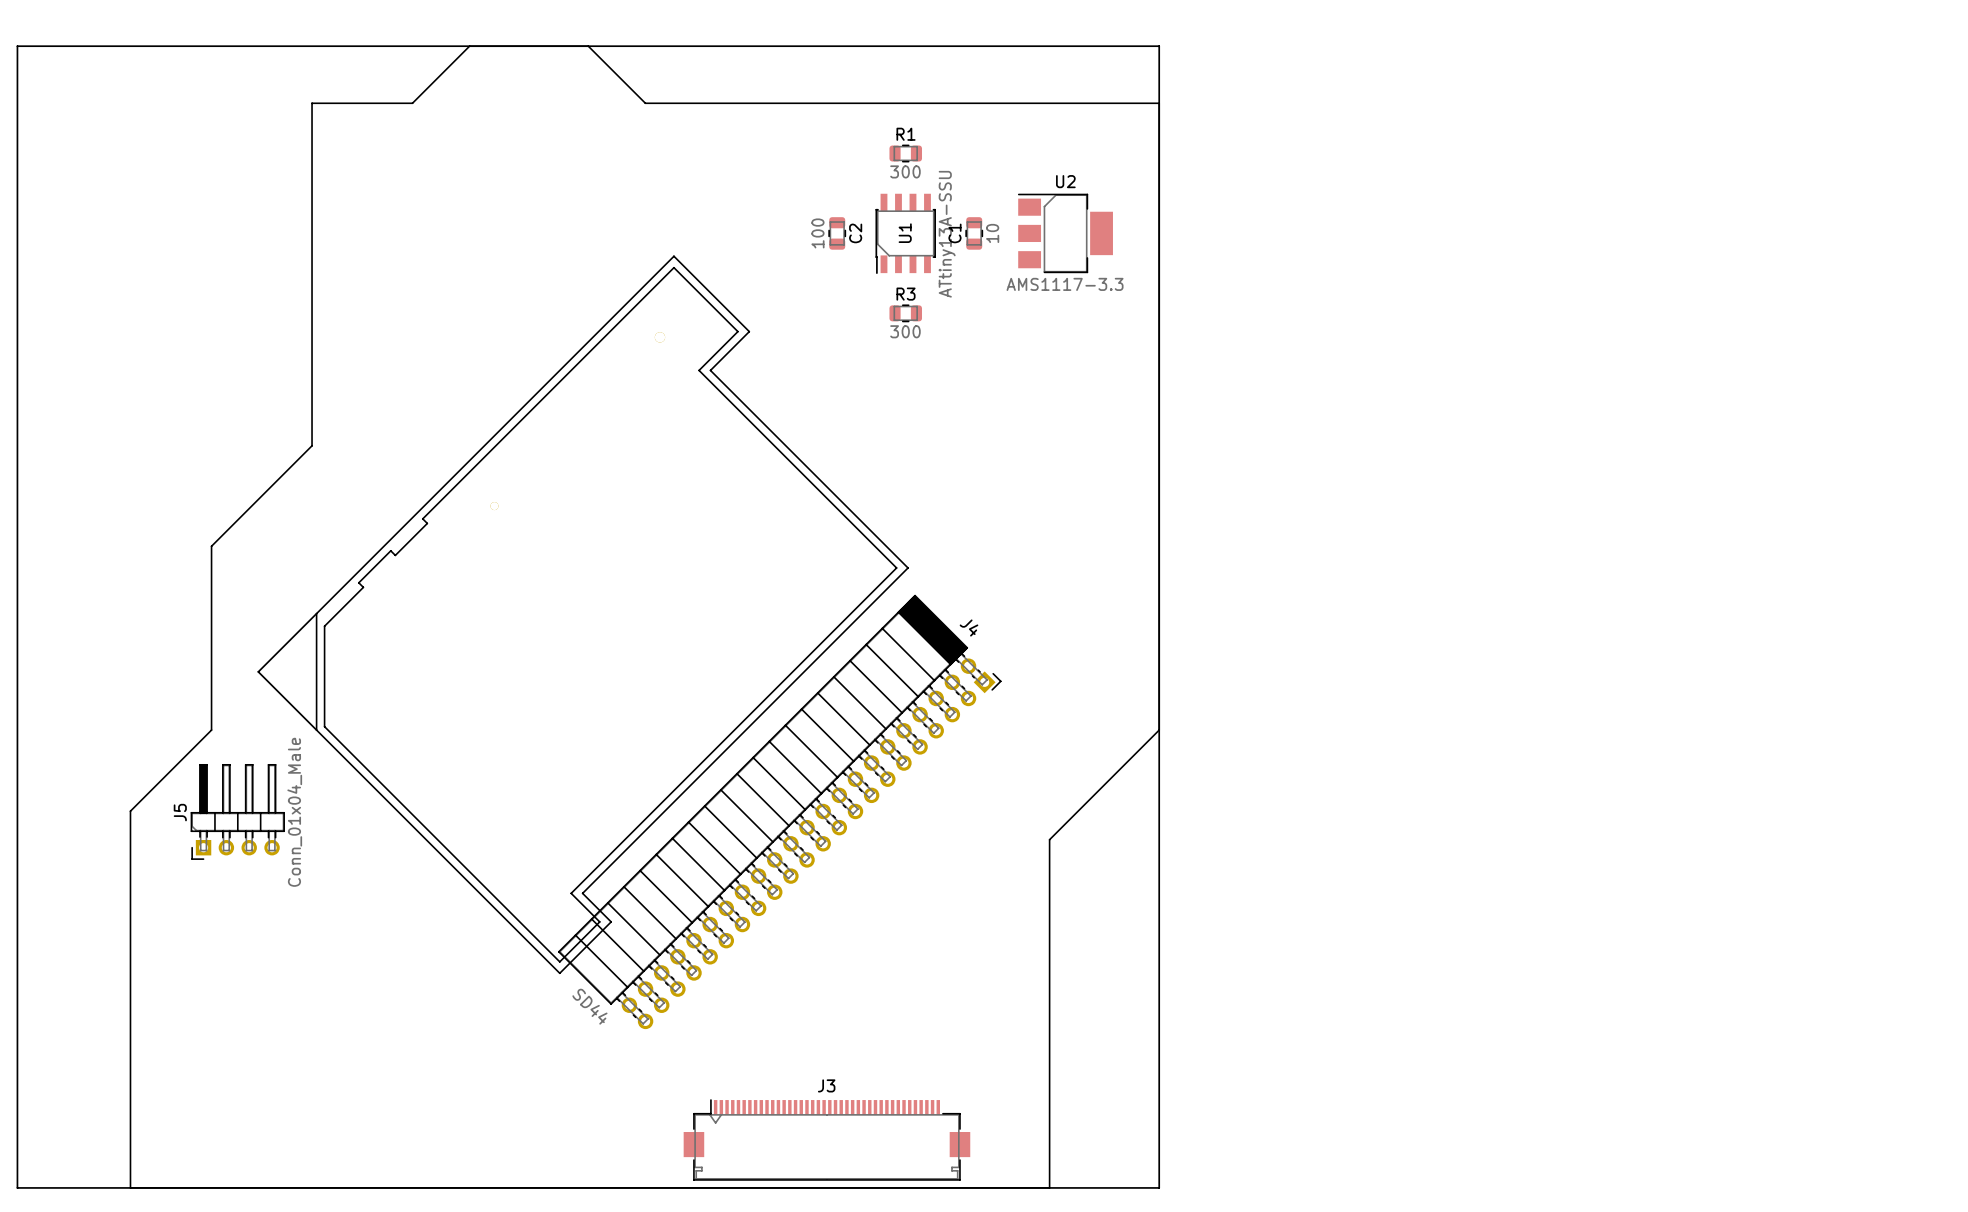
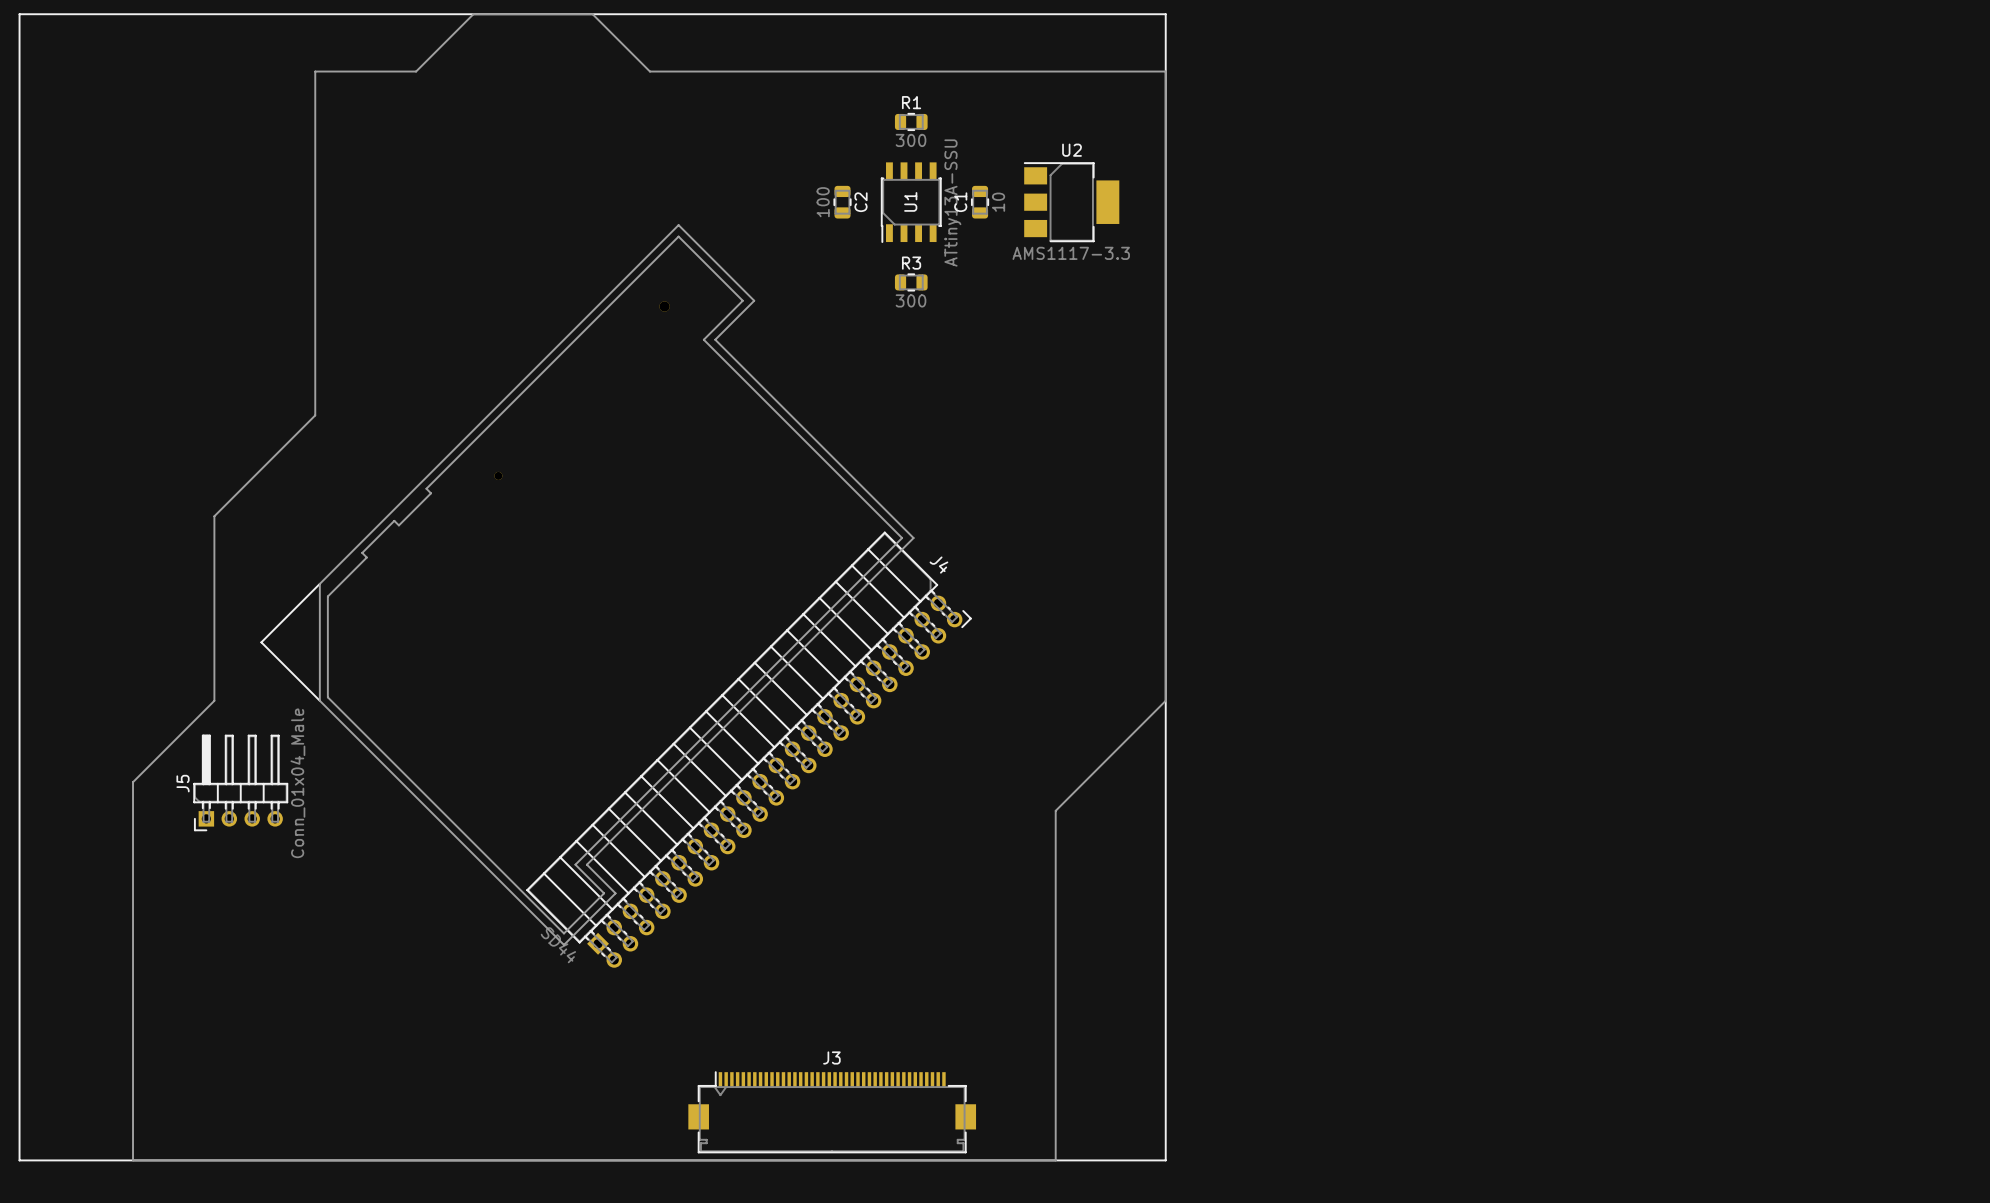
J4 footprint: [558, 594, 1002, 1030] -> [526, 531, 972, 968]

